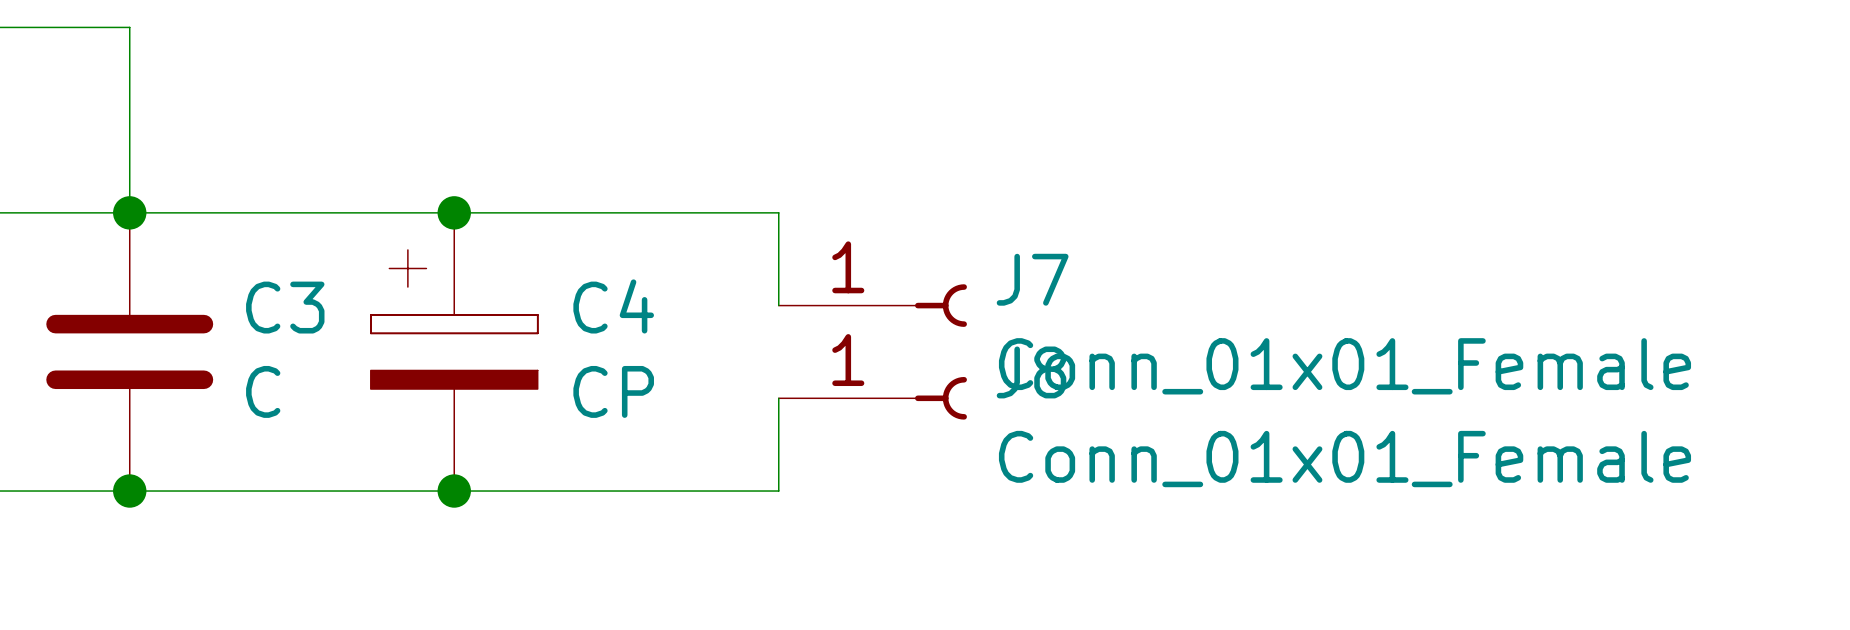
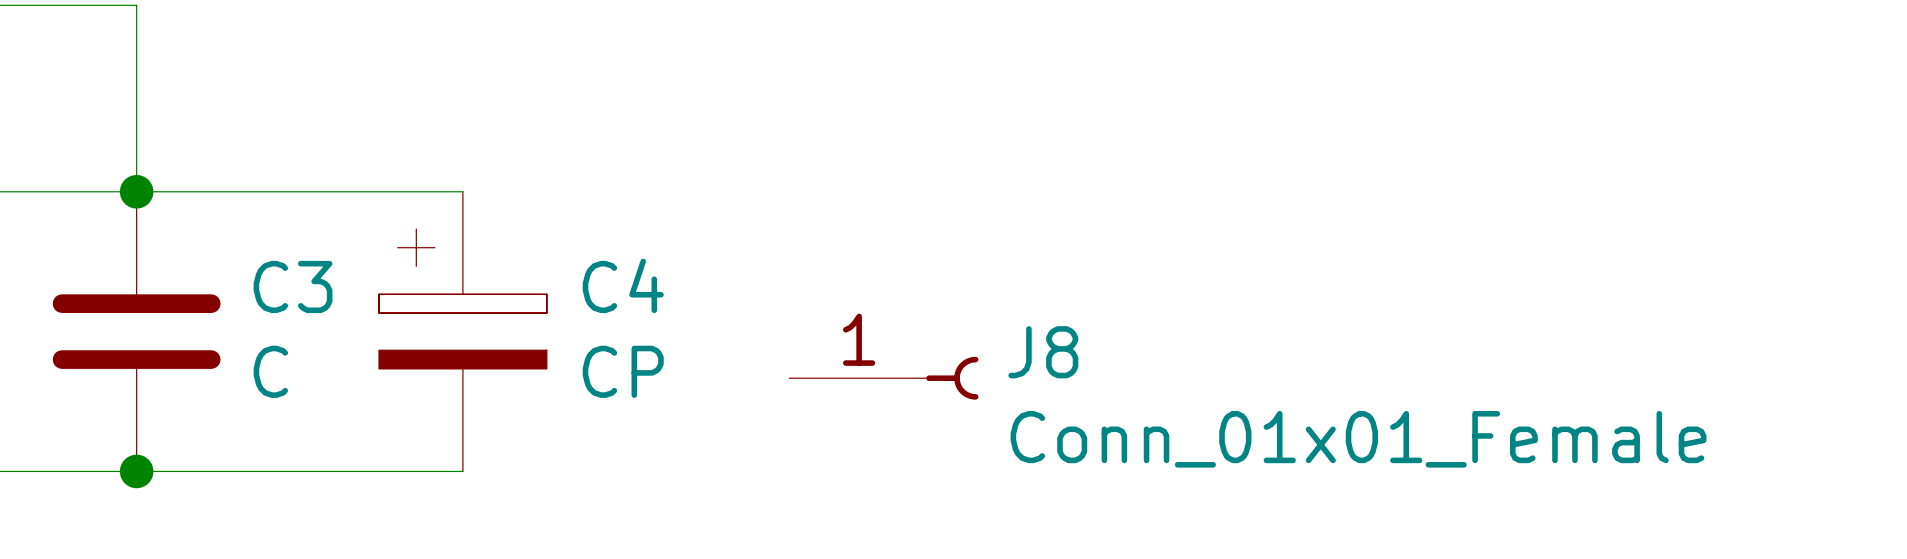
wire: (454, 212) (778, 212) (778, 305) -> none
junction: (454, 212) -> none
J7: Conn_01x01_Female (872, 305) -> none
wire: (778, 398) (778, 491) (454, 491) -> none
junction: (454, 491) -> none

